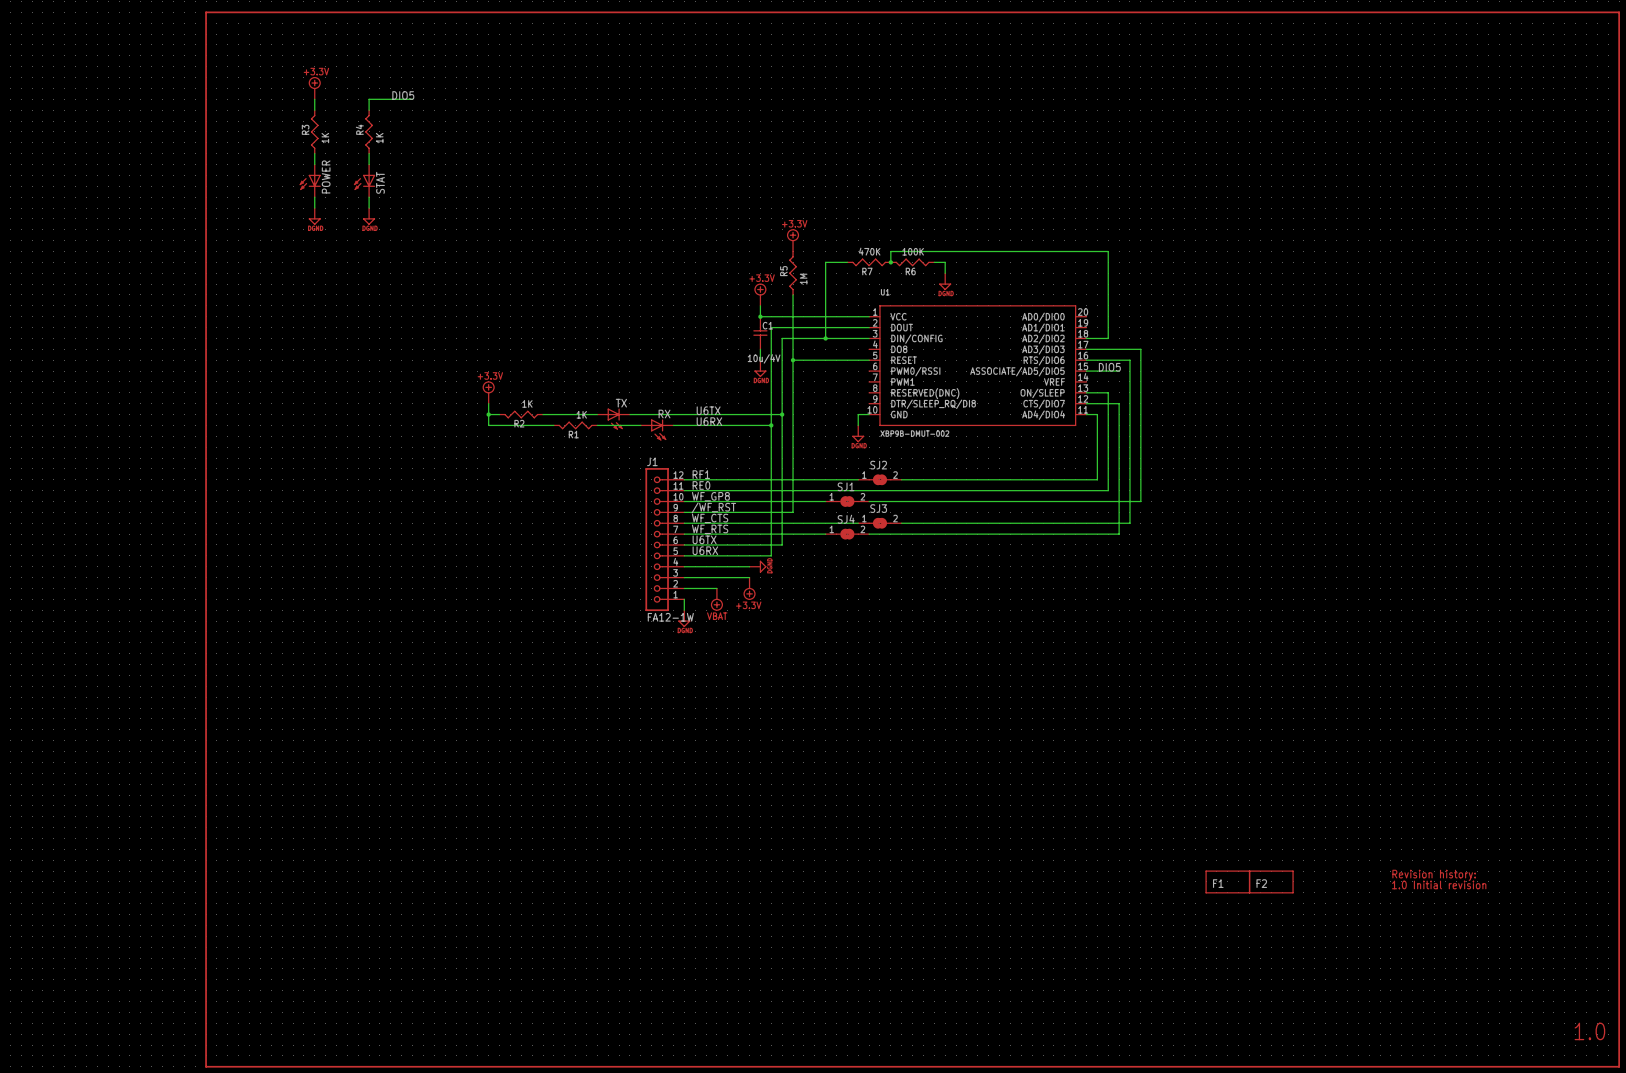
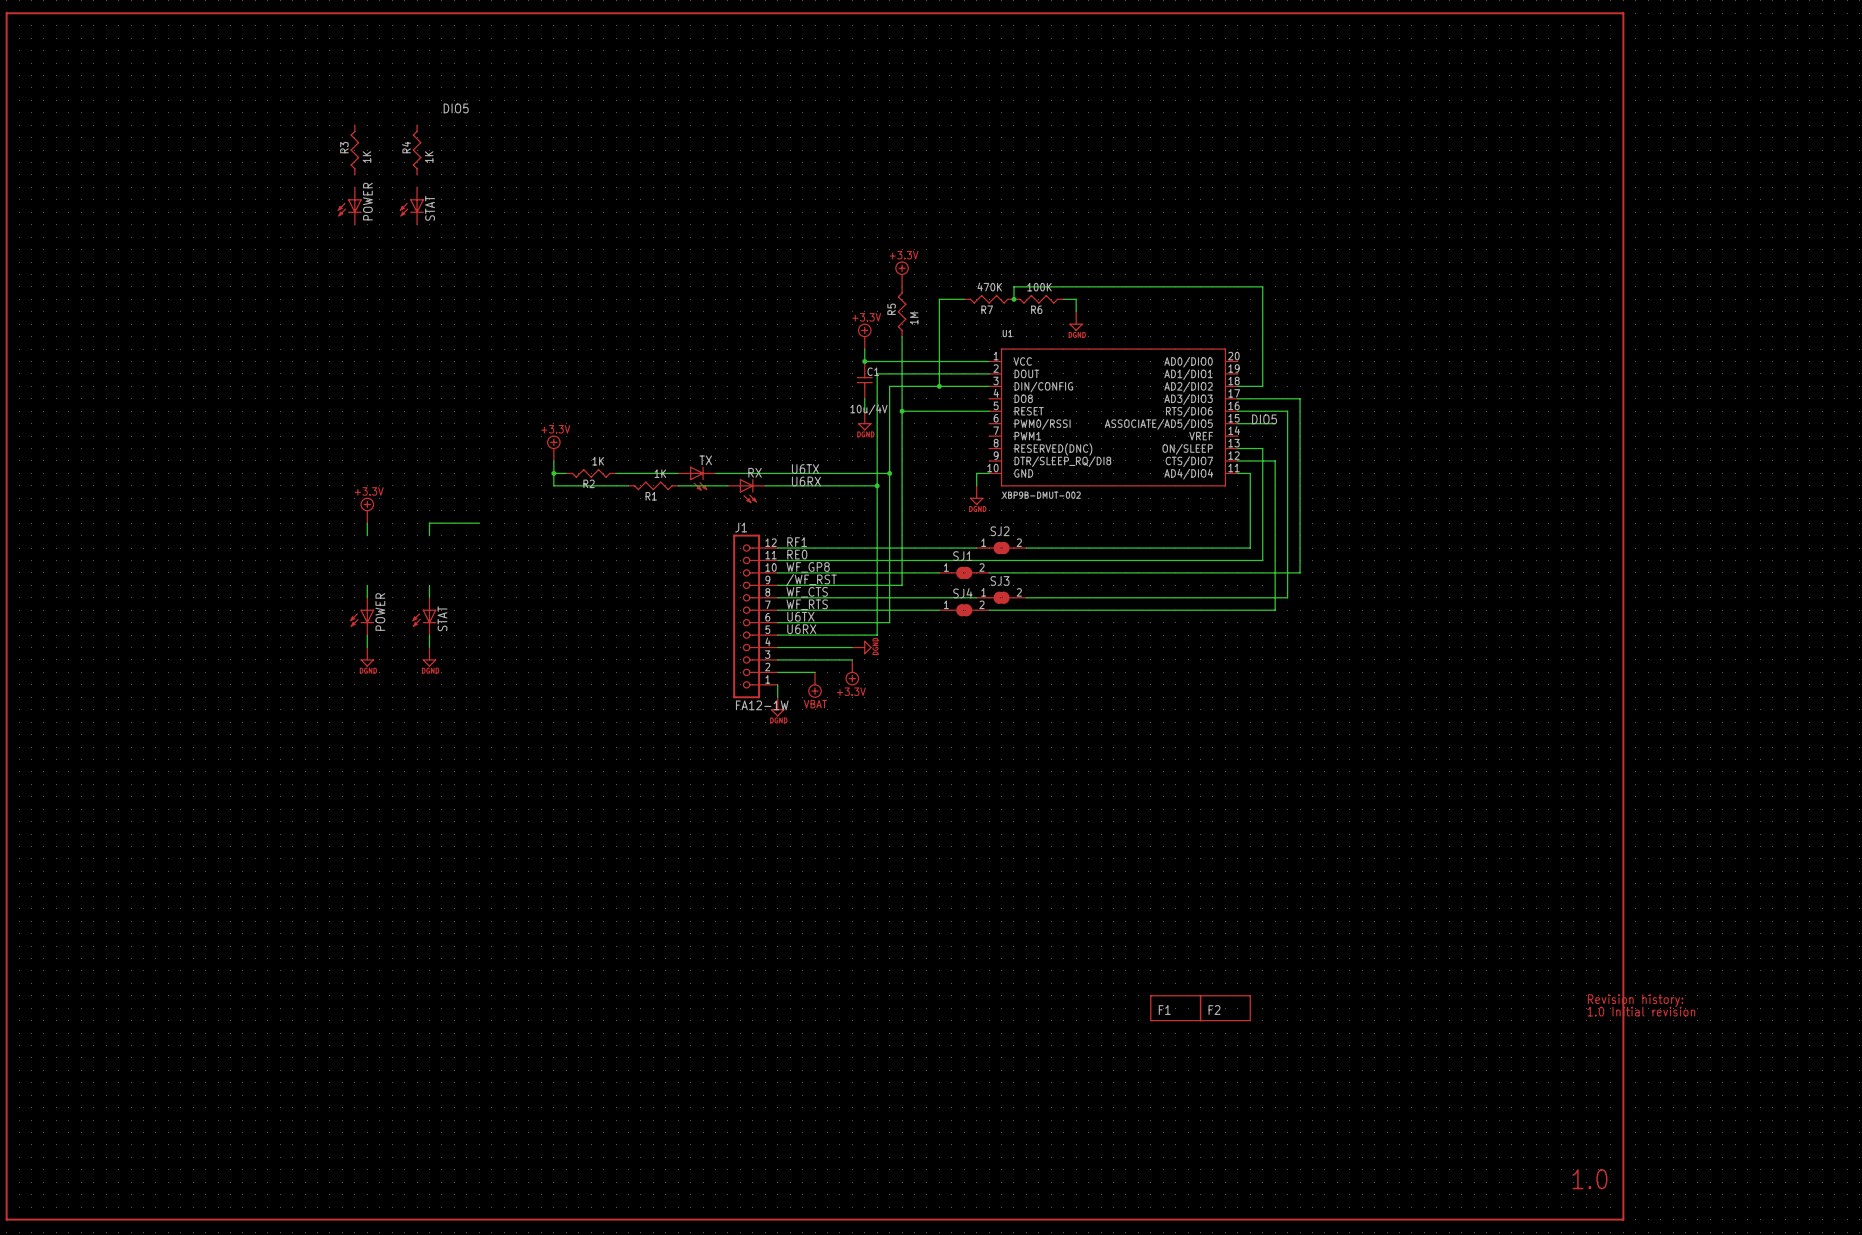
power symbol: (314, 88) -> none
wire: (314, 99) (314, 110) -> none
wire: (412, 99) (369, 99) (369, 110) -> none
wire: (314, 153) (314, 164) -> none
wire: (369, 153) (369, 164) -> none
wire: (314, 197) (314, 208) -> none
wire: (369, 197) (369, 208) -> none
power symbol: (314, 216) -> none
power symbol: (369, 216) -> none
power symbol: none -> (367, 510)
wire: none -> (367, 523) (367, 535)
wire: none -> (479, 523) (429, 523) (429, 535)
wire: none -> (367, 585) (367, 597)
wire: none -> (429, 585) (429, 597)
POWER: none -> (362, 616)
STAT: none -> (424, 616)
part: none -> (815, 616)
part: (912, 539) -> none
wire: none -> (367, 635) (367, 647)
wire: none -> (429, 635) (429, 647)
power symbol: none -> (367, 657)
power symbol: none -> (429, 657)
F1 position: (1227, 881) -> (1175, 1008)
F2 position: (1271, 881) -> (1225, 1008)
text: none -> 1.0 (1589, 1179)
text: 1.0 (1589, 1031) -> none

